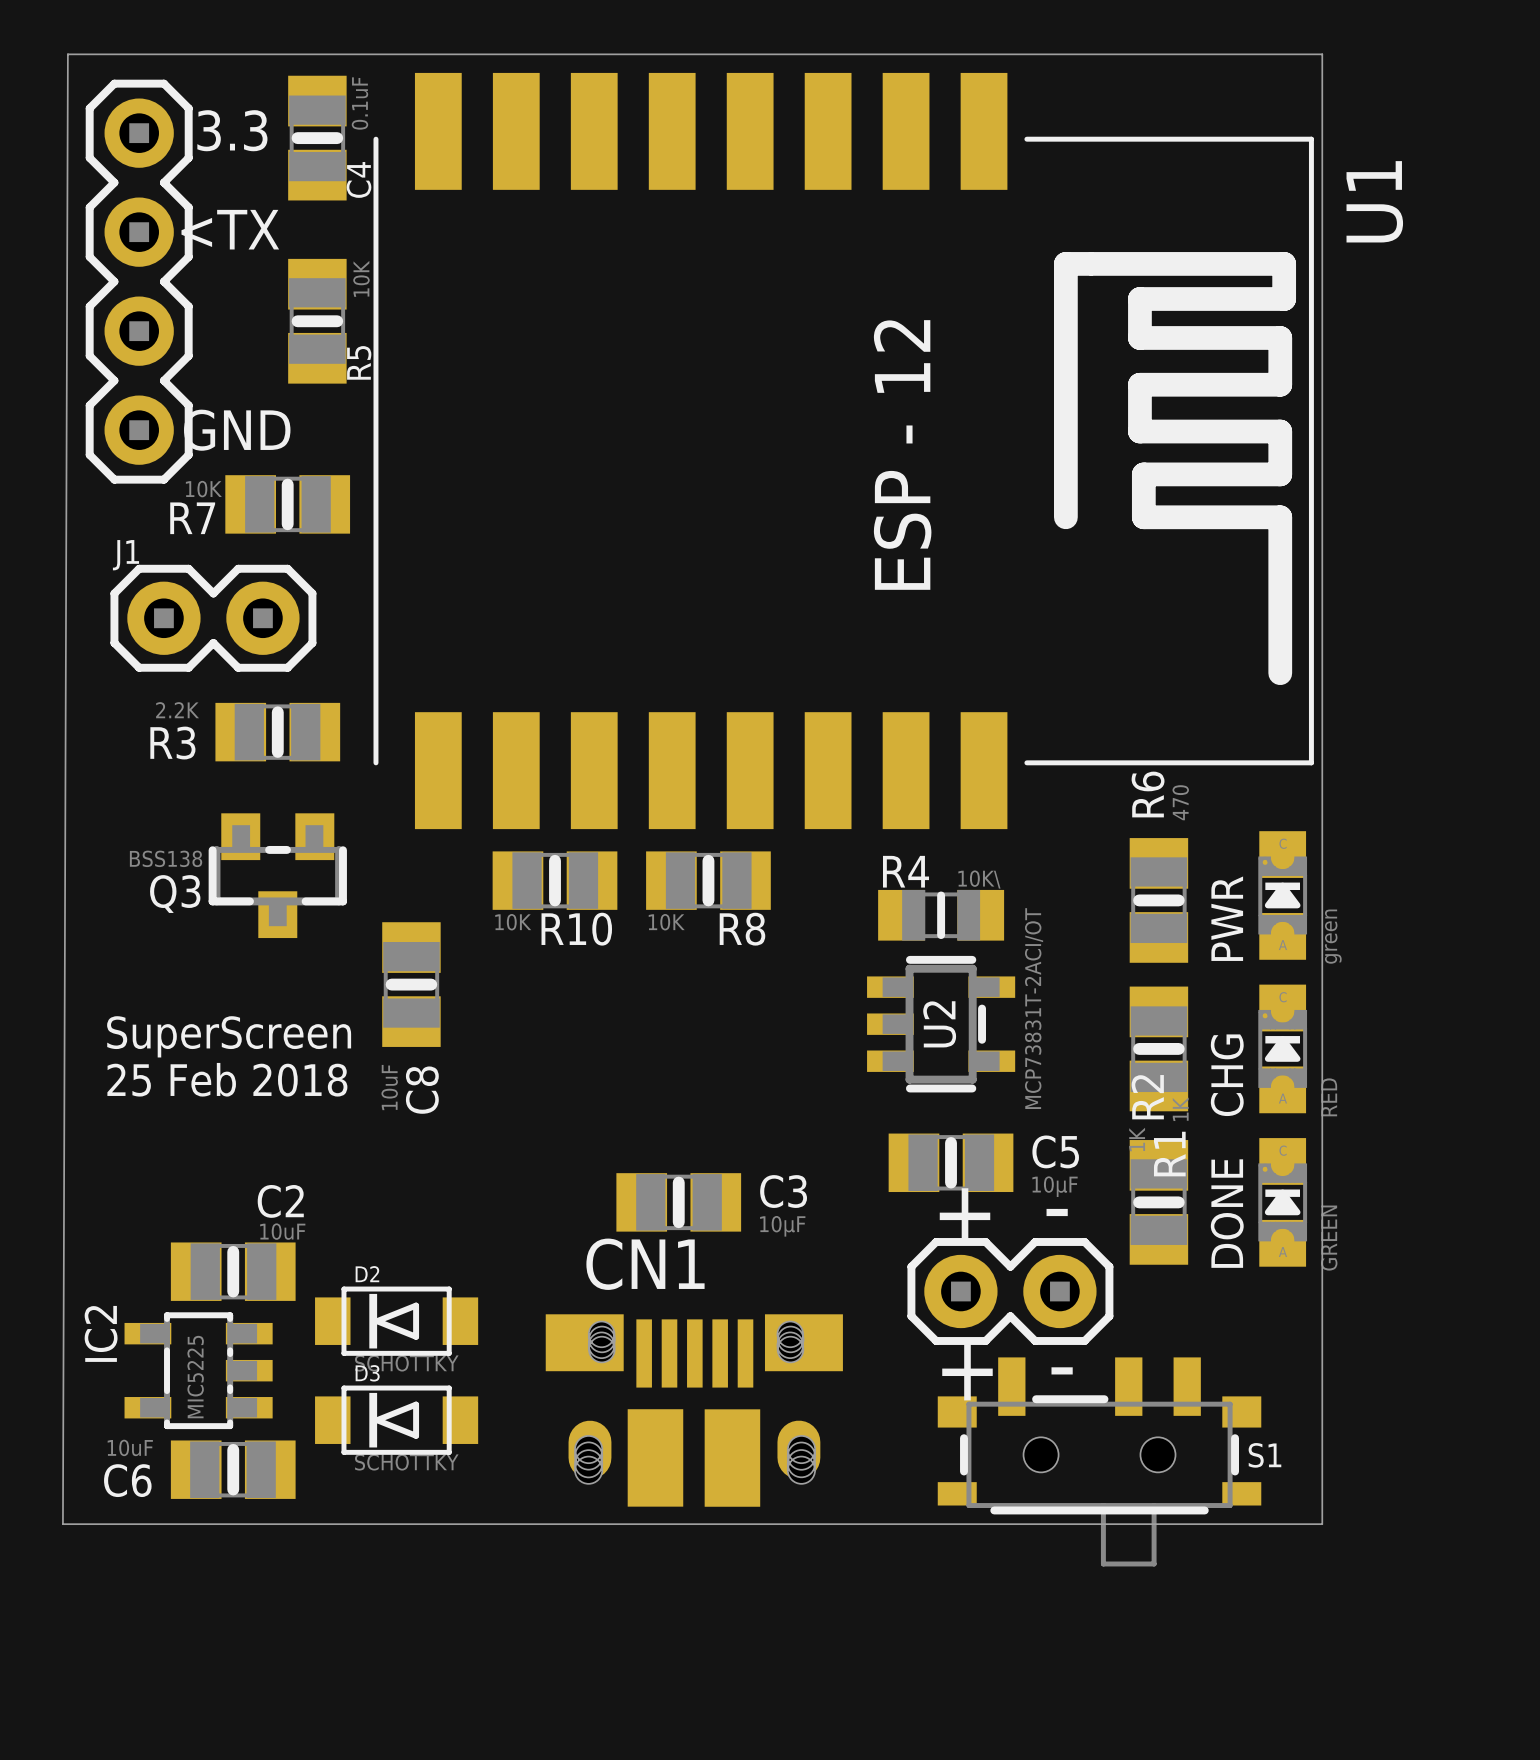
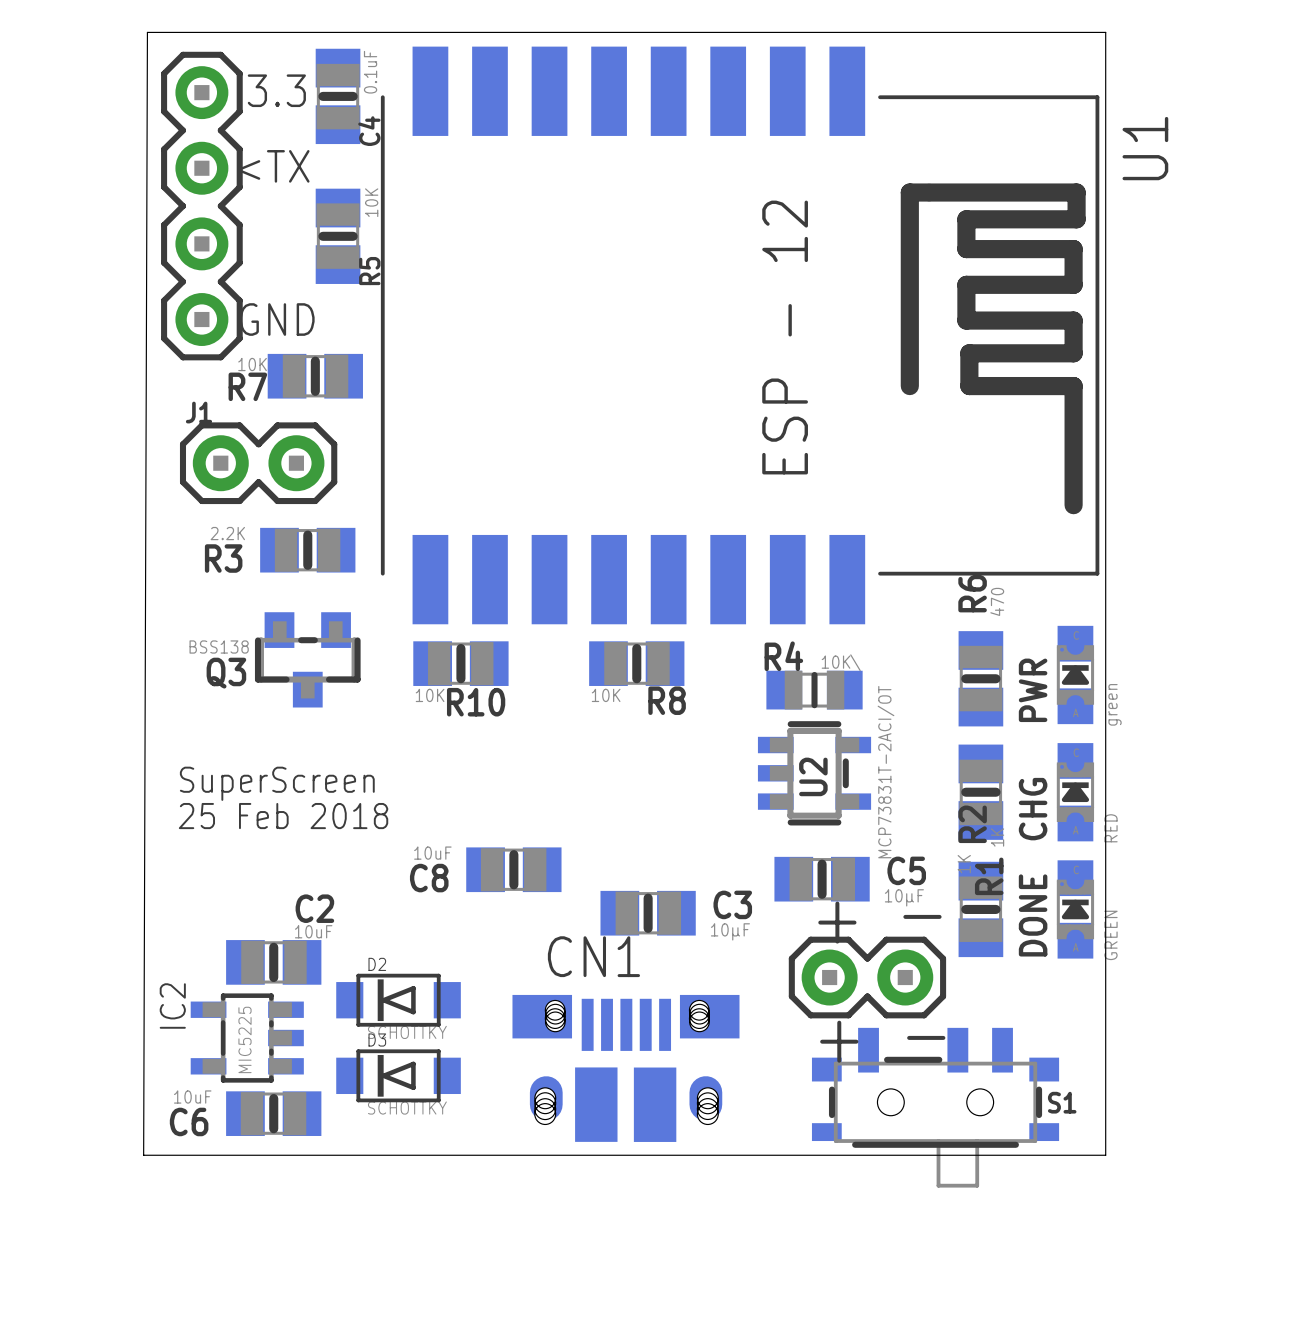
R10 position: (555, 880) -> (460, 663)
R10 name position: R10 (576, 929) -> R10 (476, 702)
C8 rotation: 0° (411, 984) -> 90° clockwise (513, 869)
C8 position: (411, 984) -> (513, 869)
C3 position: (678, 1202) -> (648, 913)

